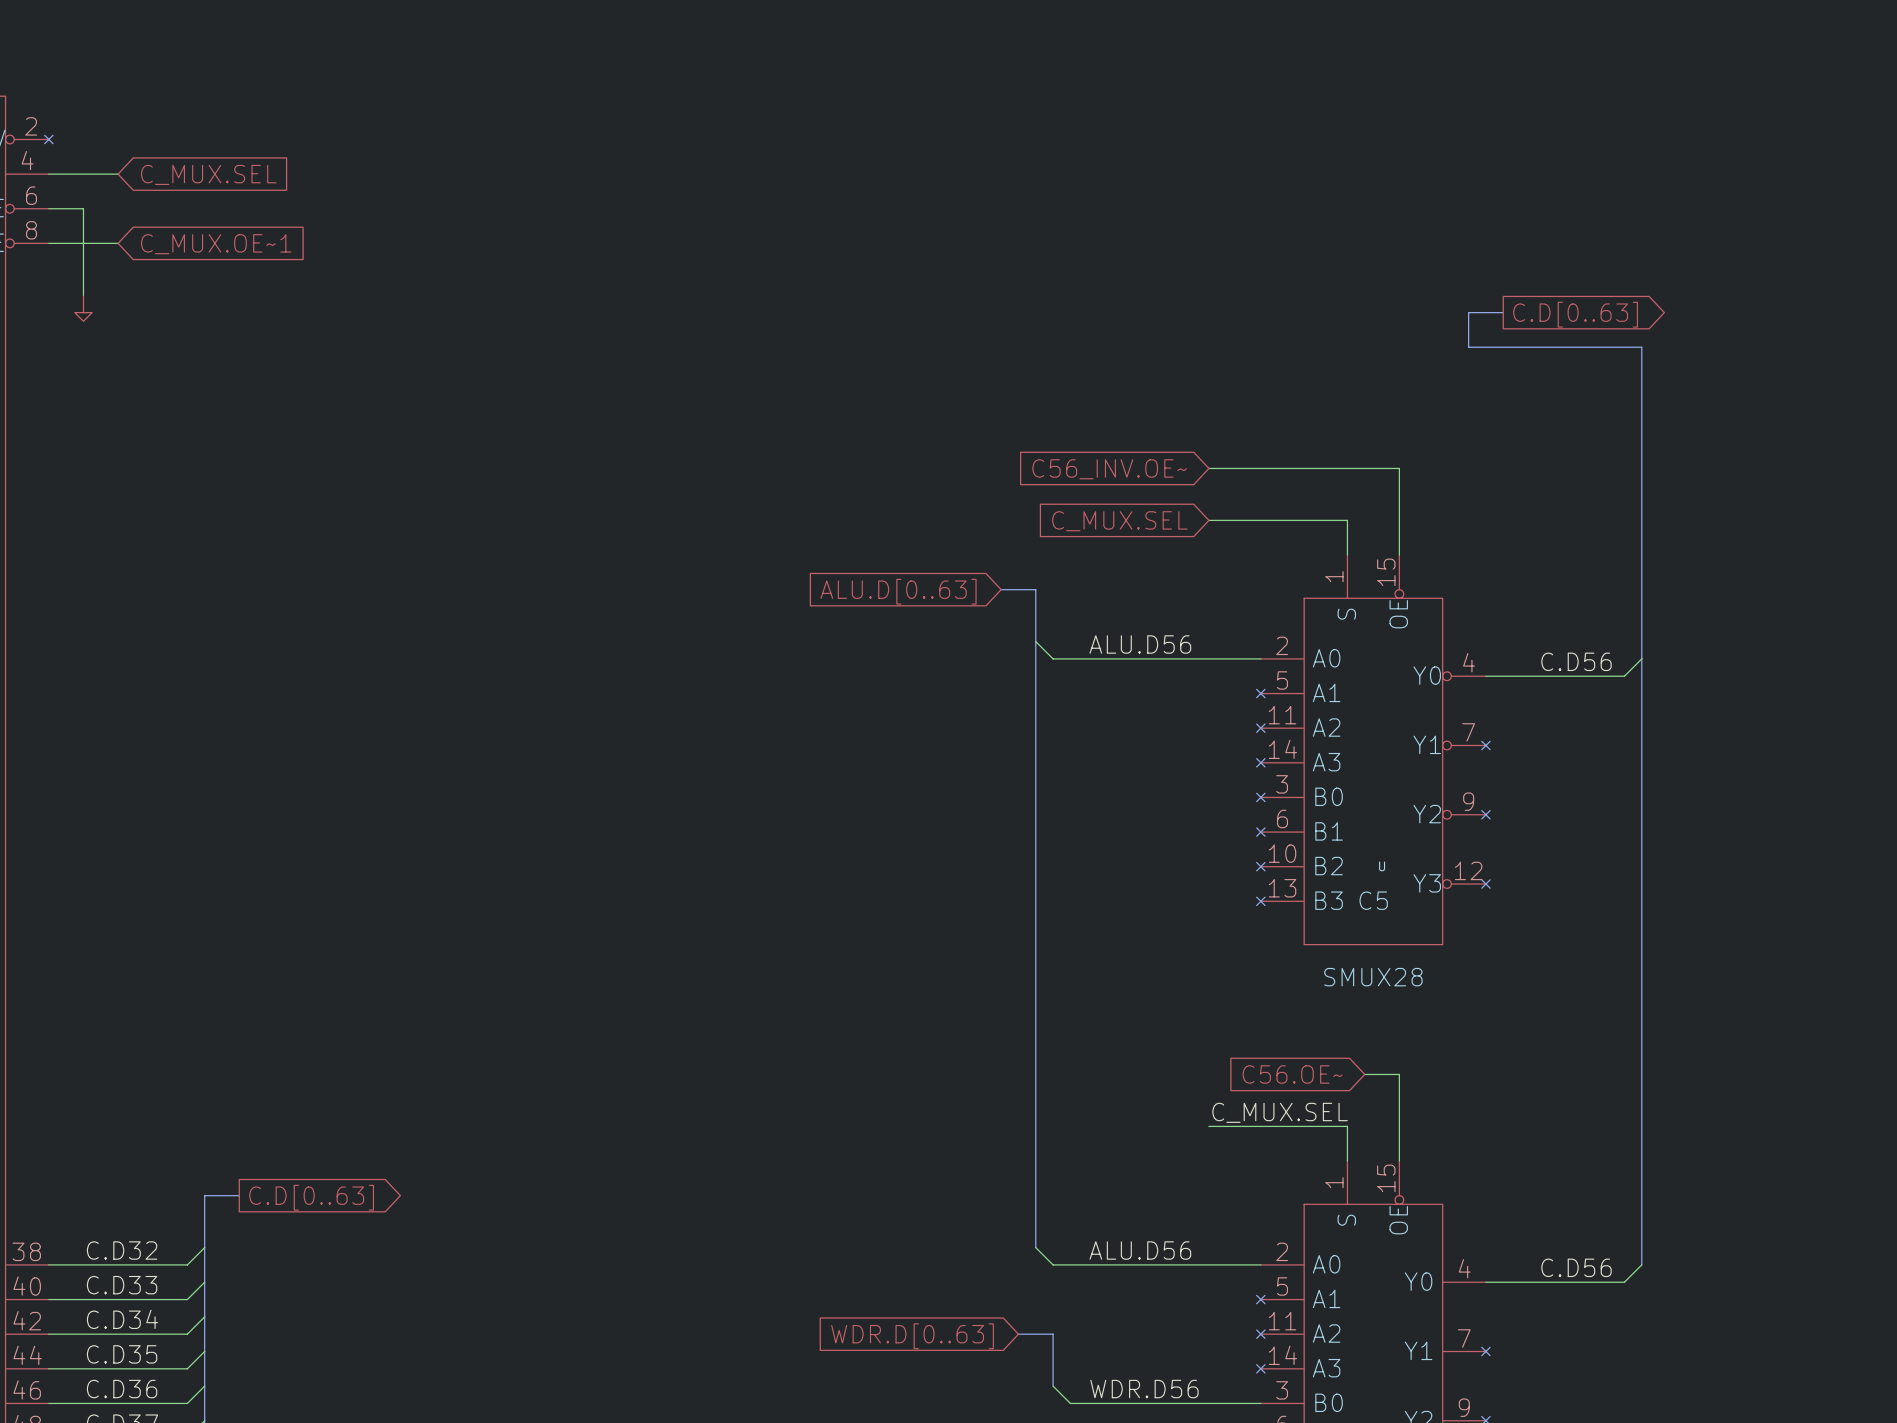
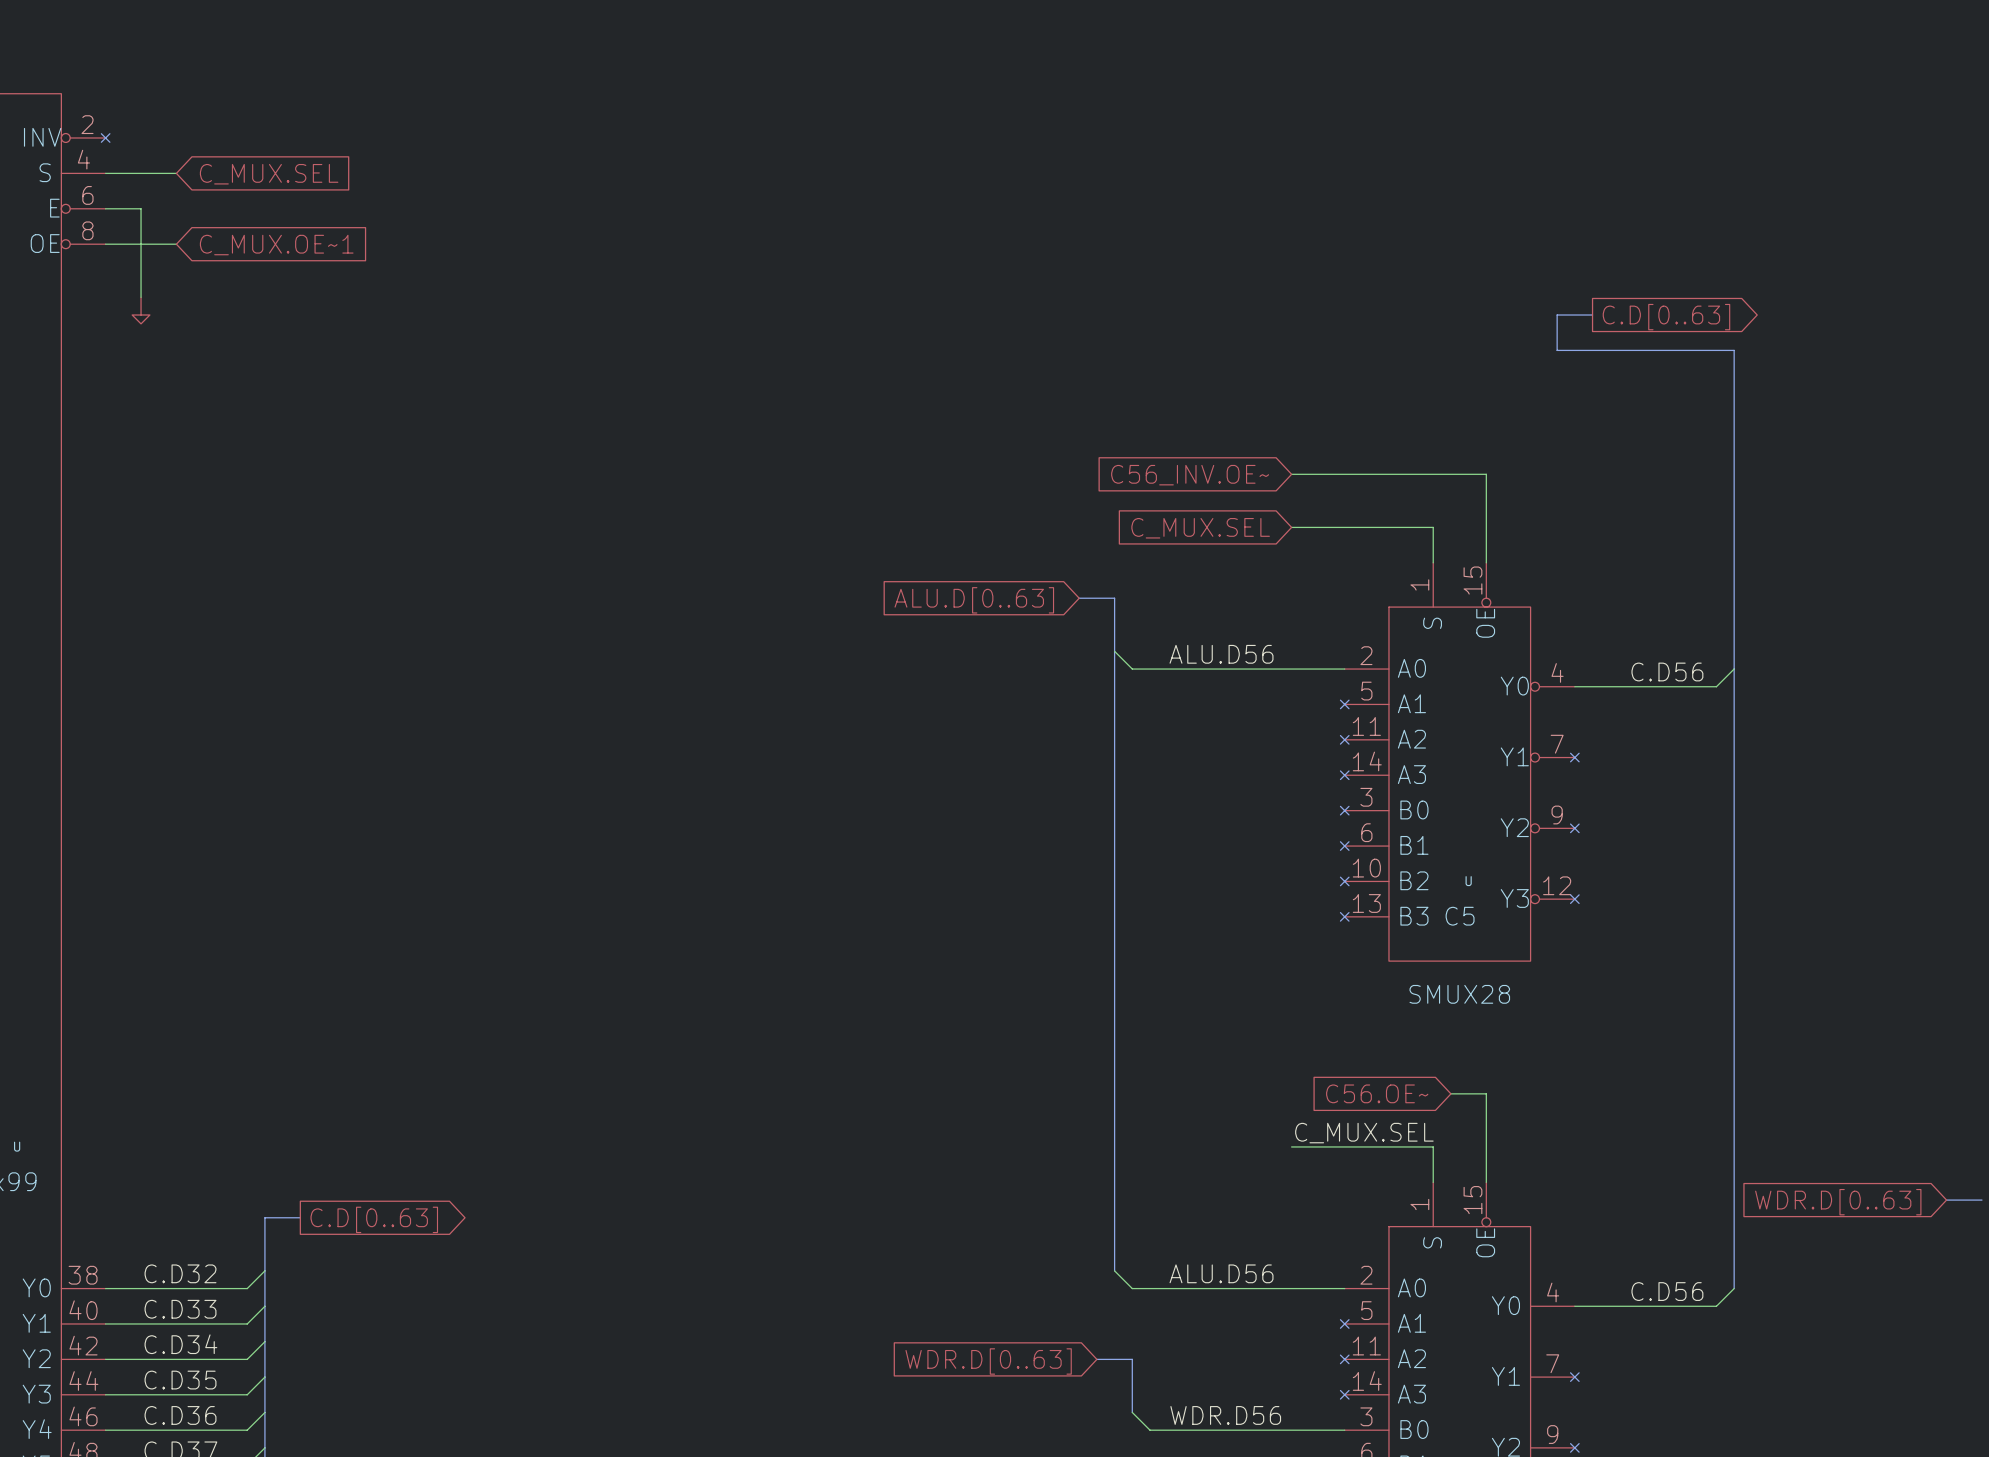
bus: none -> (1946, 1200) (1981, 1200)
global label: none -> WDR.D[0..63] (1838, 1202)

